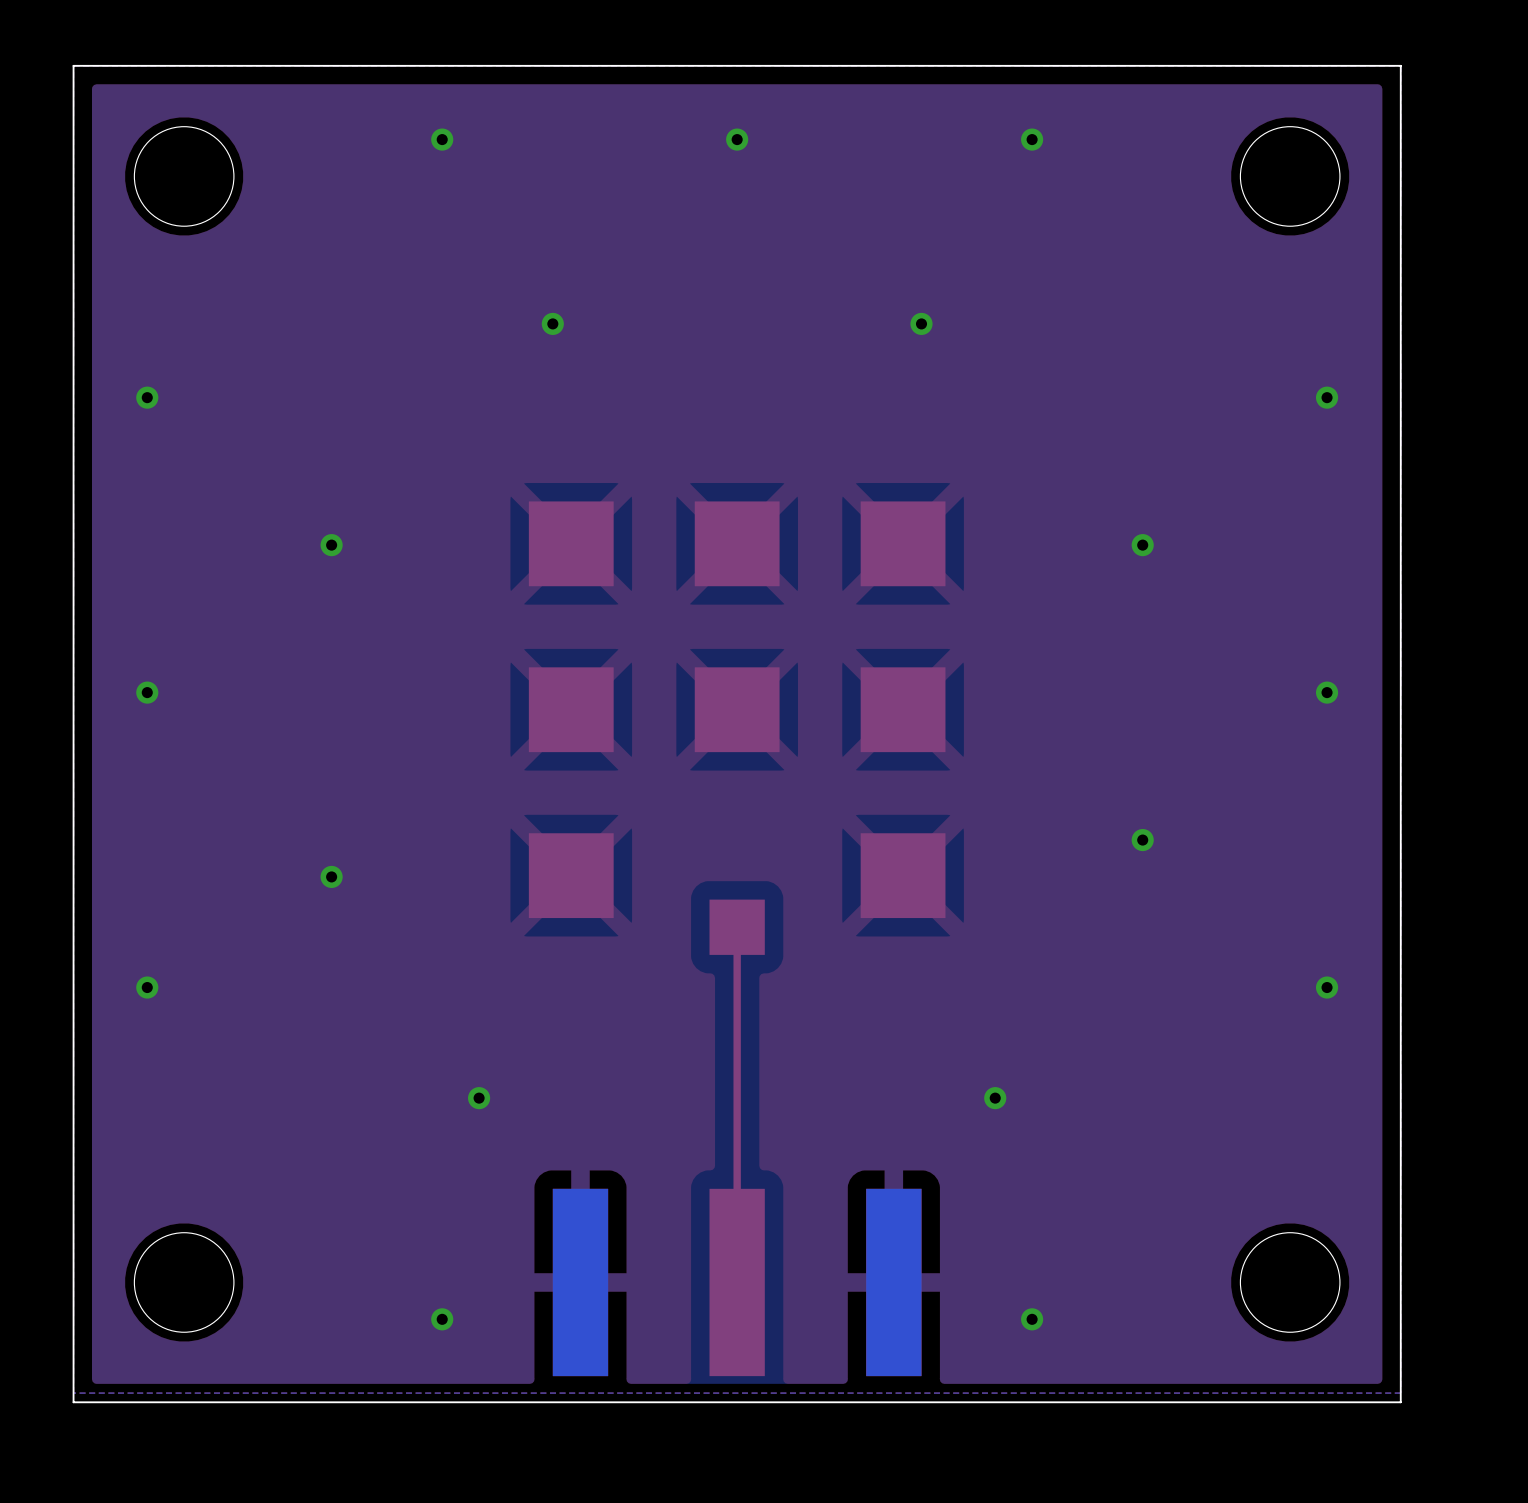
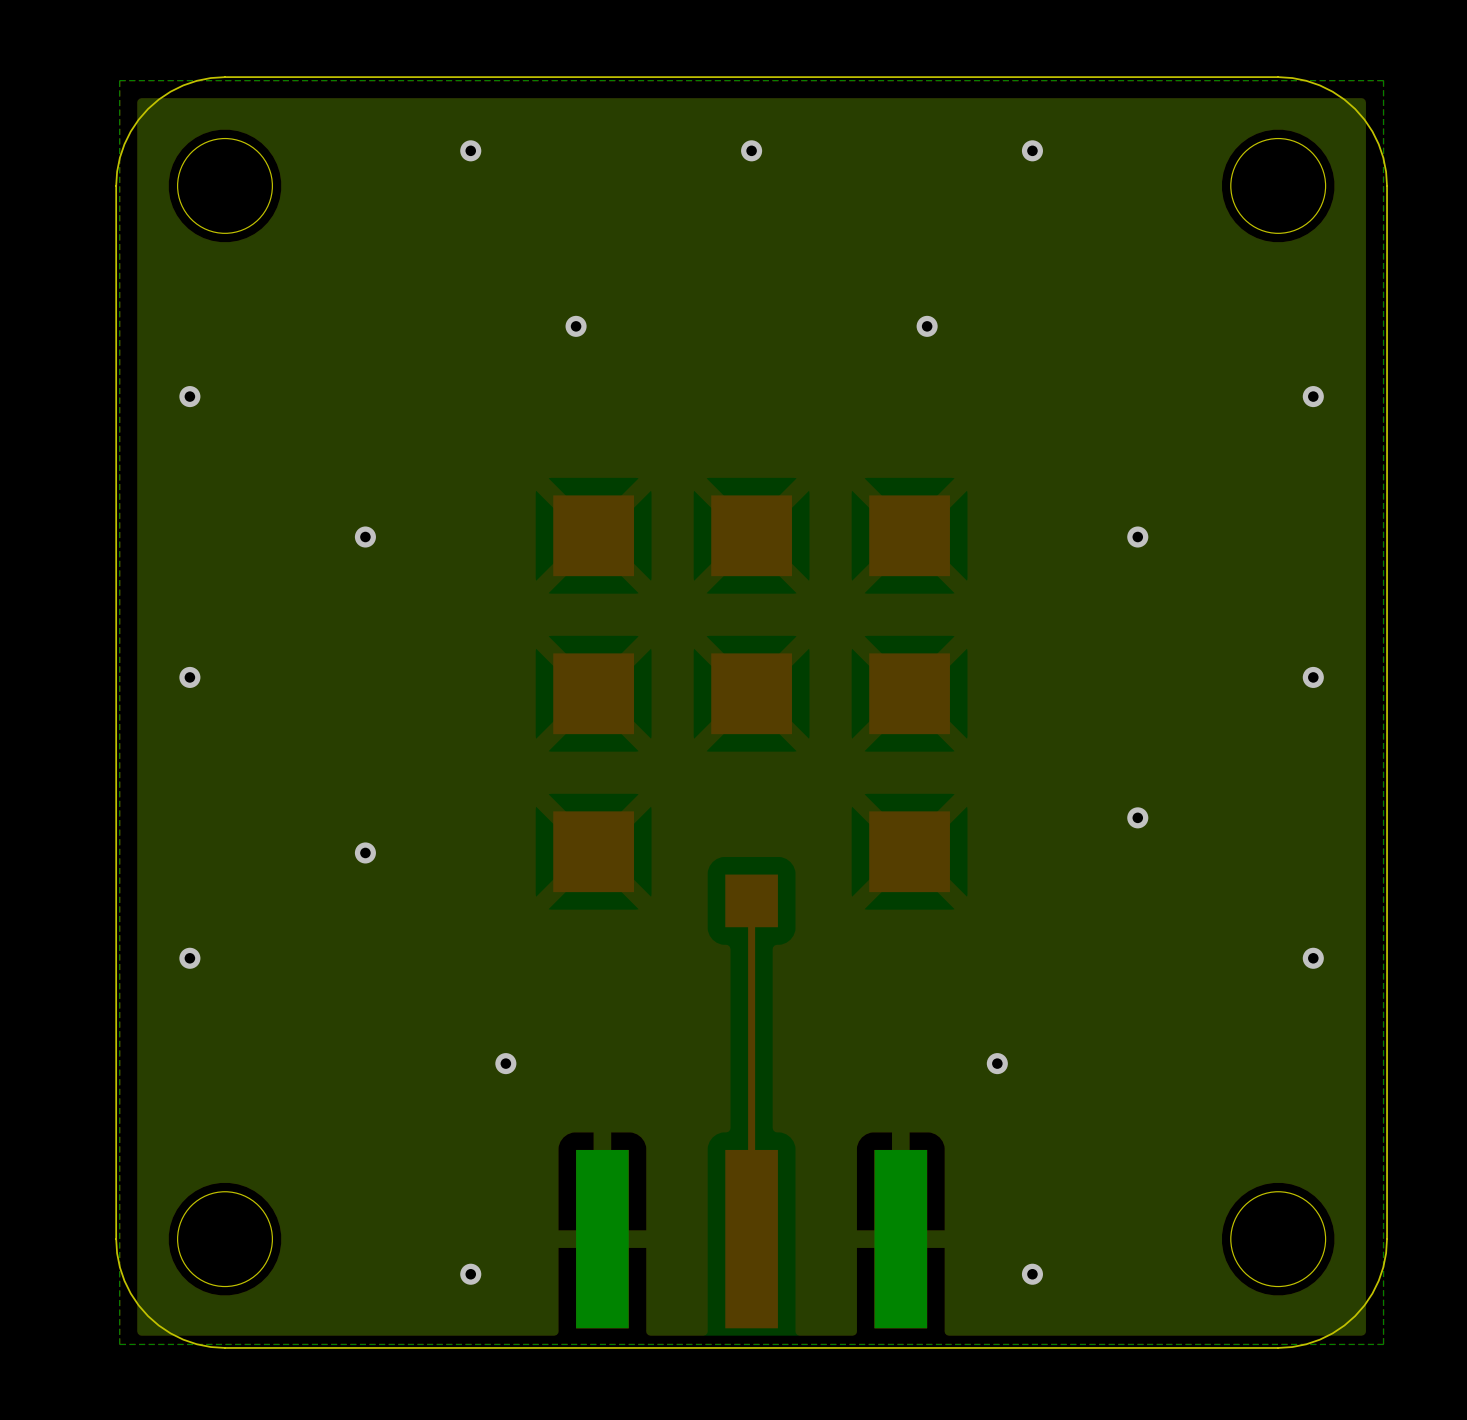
board edge: (1400, 65) (73, 65) (73, 1402) (1400, 1402) (1400, 65) -> (1278, 77) (1292, 78) (1319, 85) (1332, 91) (1355, 108) (1364, 119) (1378, 144) (1383, 157) (1387, 185) (1387, 1239) (1383, 1267) (1378, 1280) (1364, 1305) (1355, 1316) (1344, 1325) (1319, 1339) (1292, 1347) (1278, 1347) (225, 1347) (196, 1344) (183, 1339) (158, 1325) (148, 1316) (138, 1305) (124, 1280) (119, 1267) (116, 1239) (116, 185) (117, 171) (124, 144) (130, 131) (148, 108) (170, 91) (183, 85) (210, 78) (225, 77) (1278, 77)

